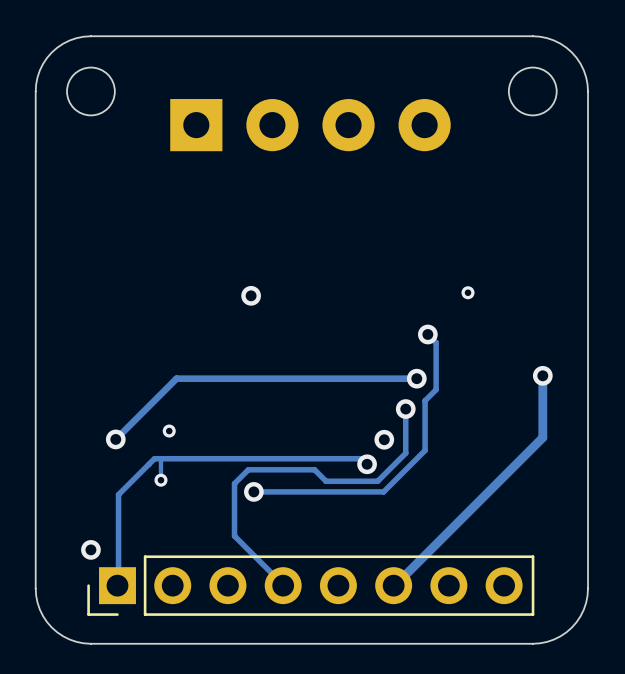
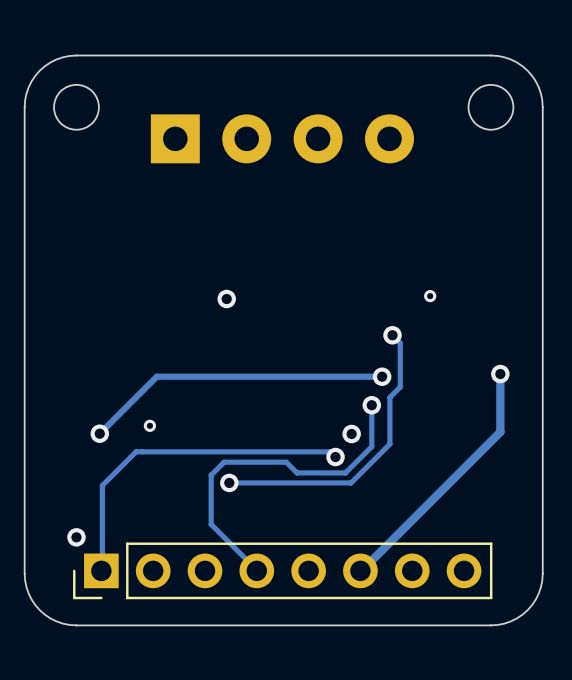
track: (160, 458) (160, 480) -> none
via: (160, 480) -> none

